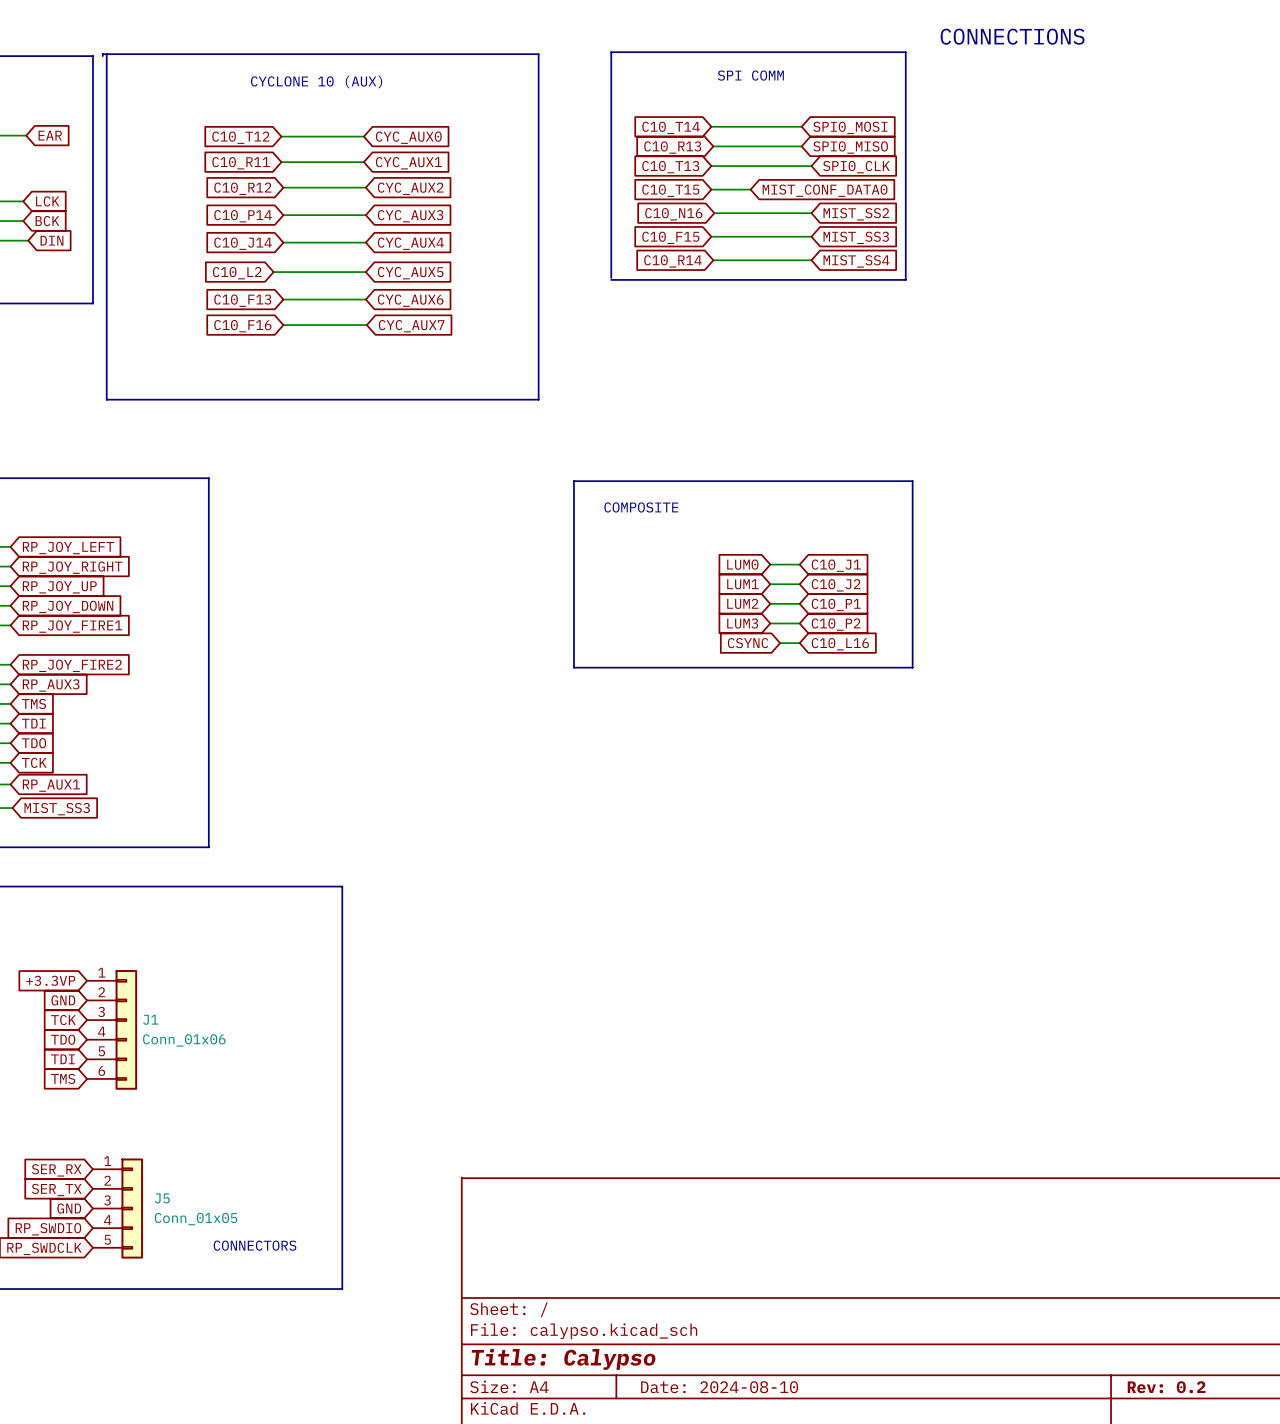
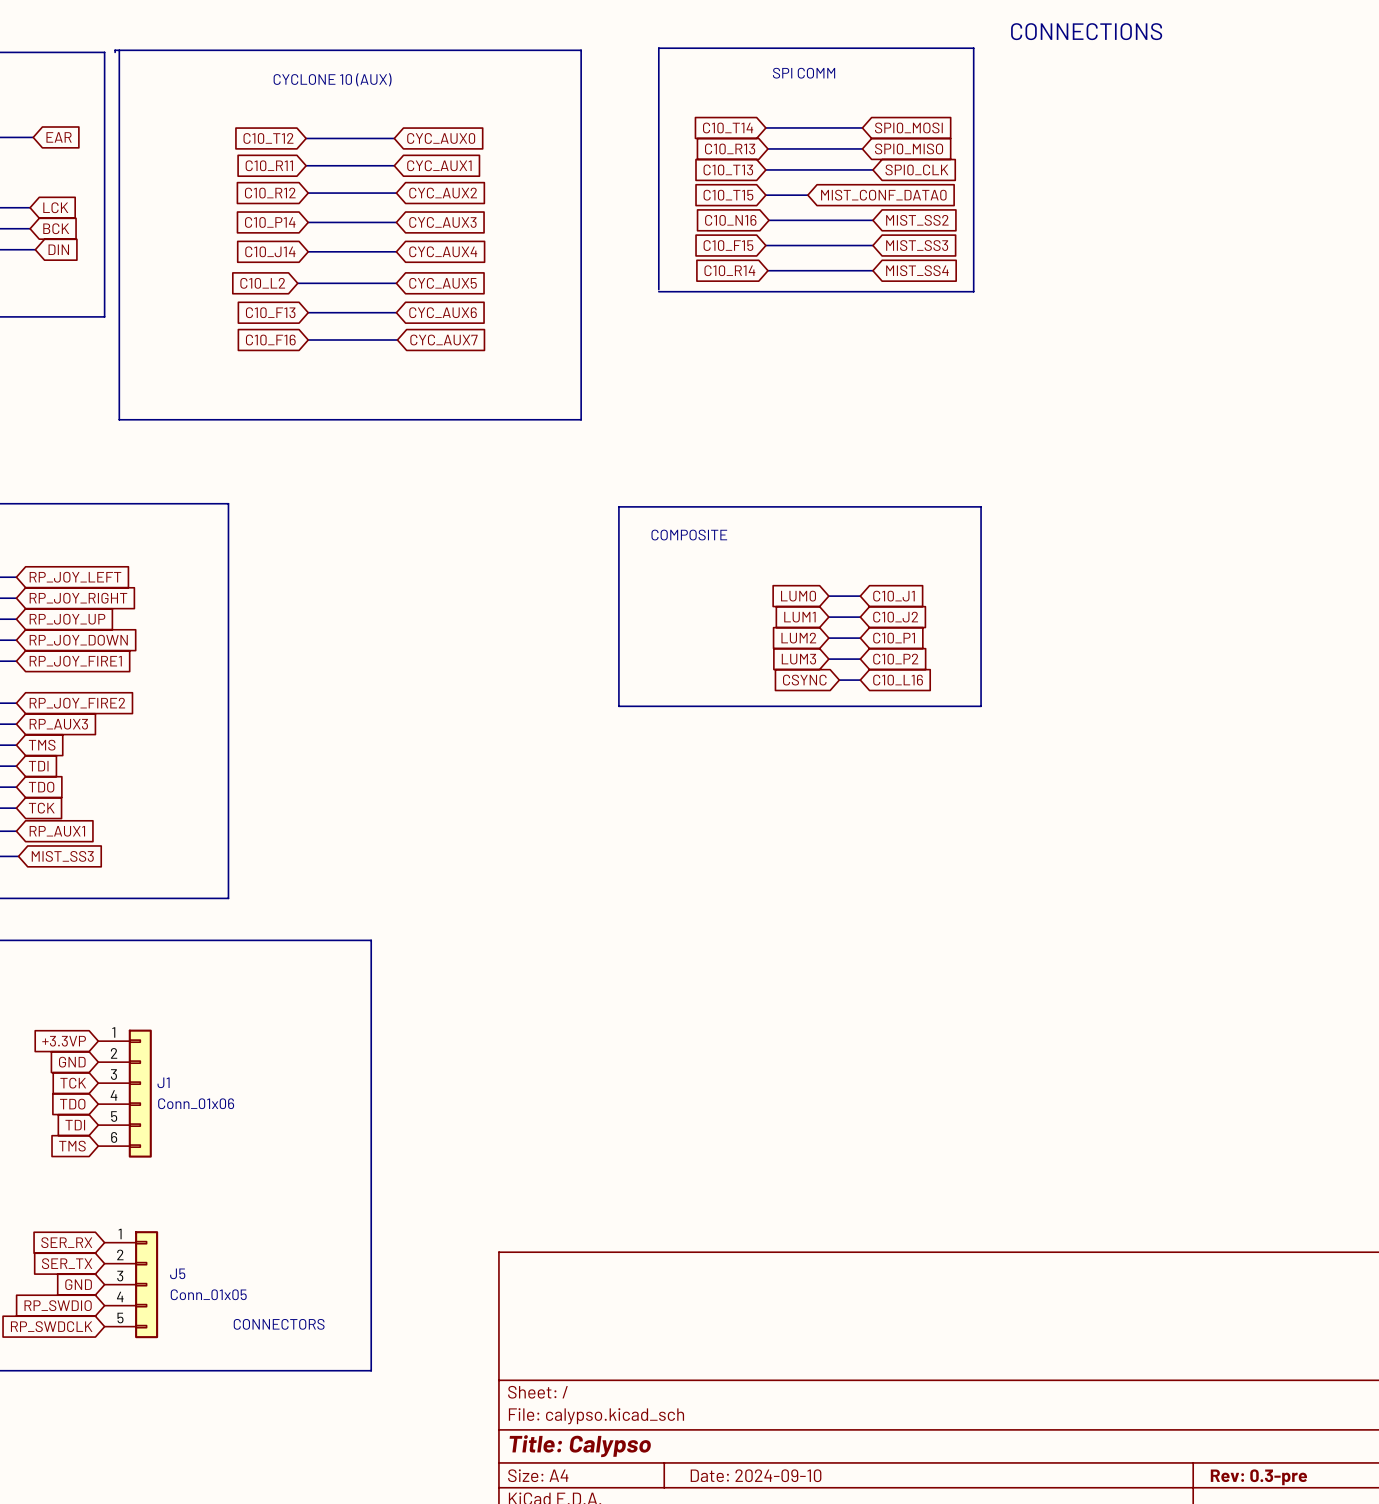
title block: Date: 2024-08-10 (719, 1387) -> Date: 2024-09-10 (756, 1475)
title block: Rev: 0.2 (1166, 1387) -> Rev: 0.3-pre (1258, 1477)

